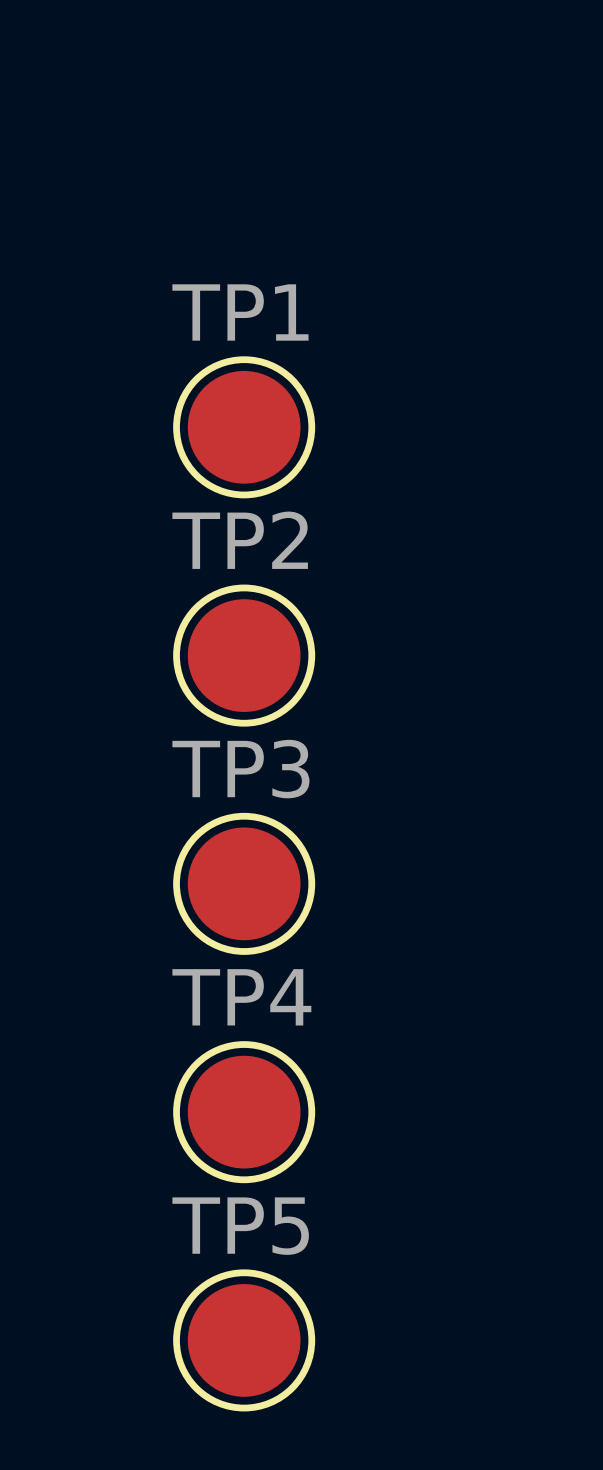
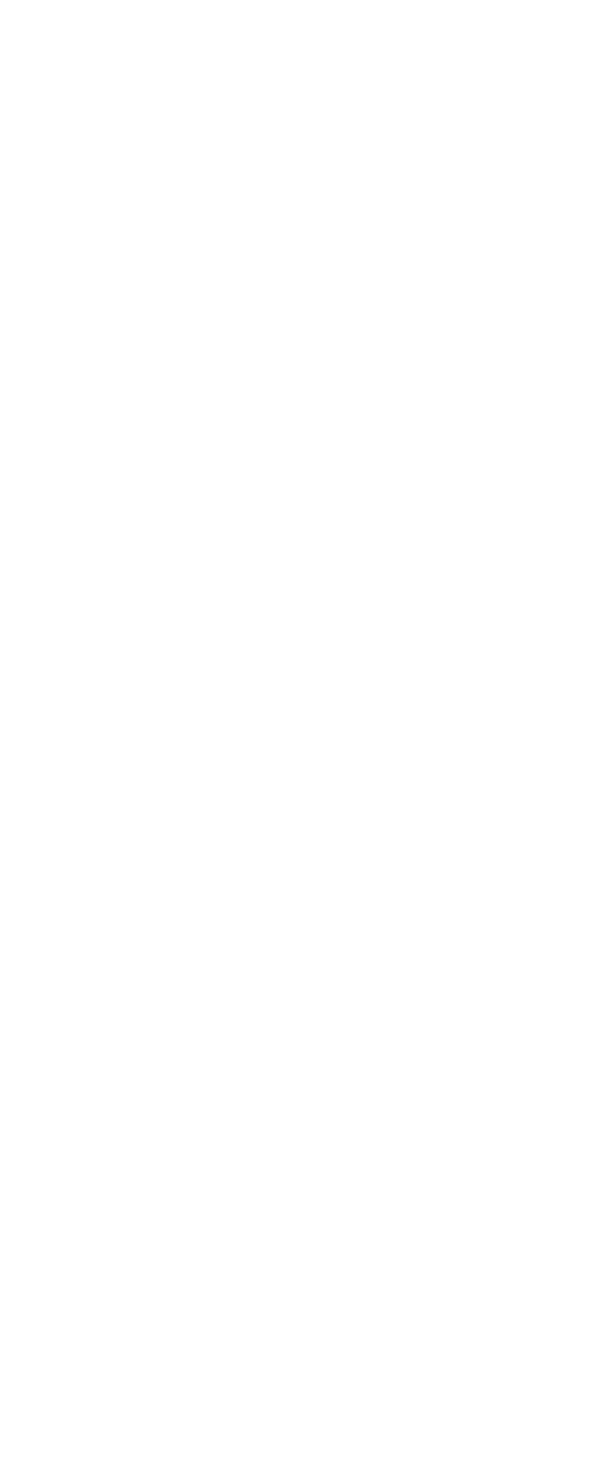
TP1: (244, 427) -> none
TP2: (244, 655) -> none
TP3: (244, 883) -> none
TP4: (244, 1112) -> none
TP5: (244, 1340) -> none

